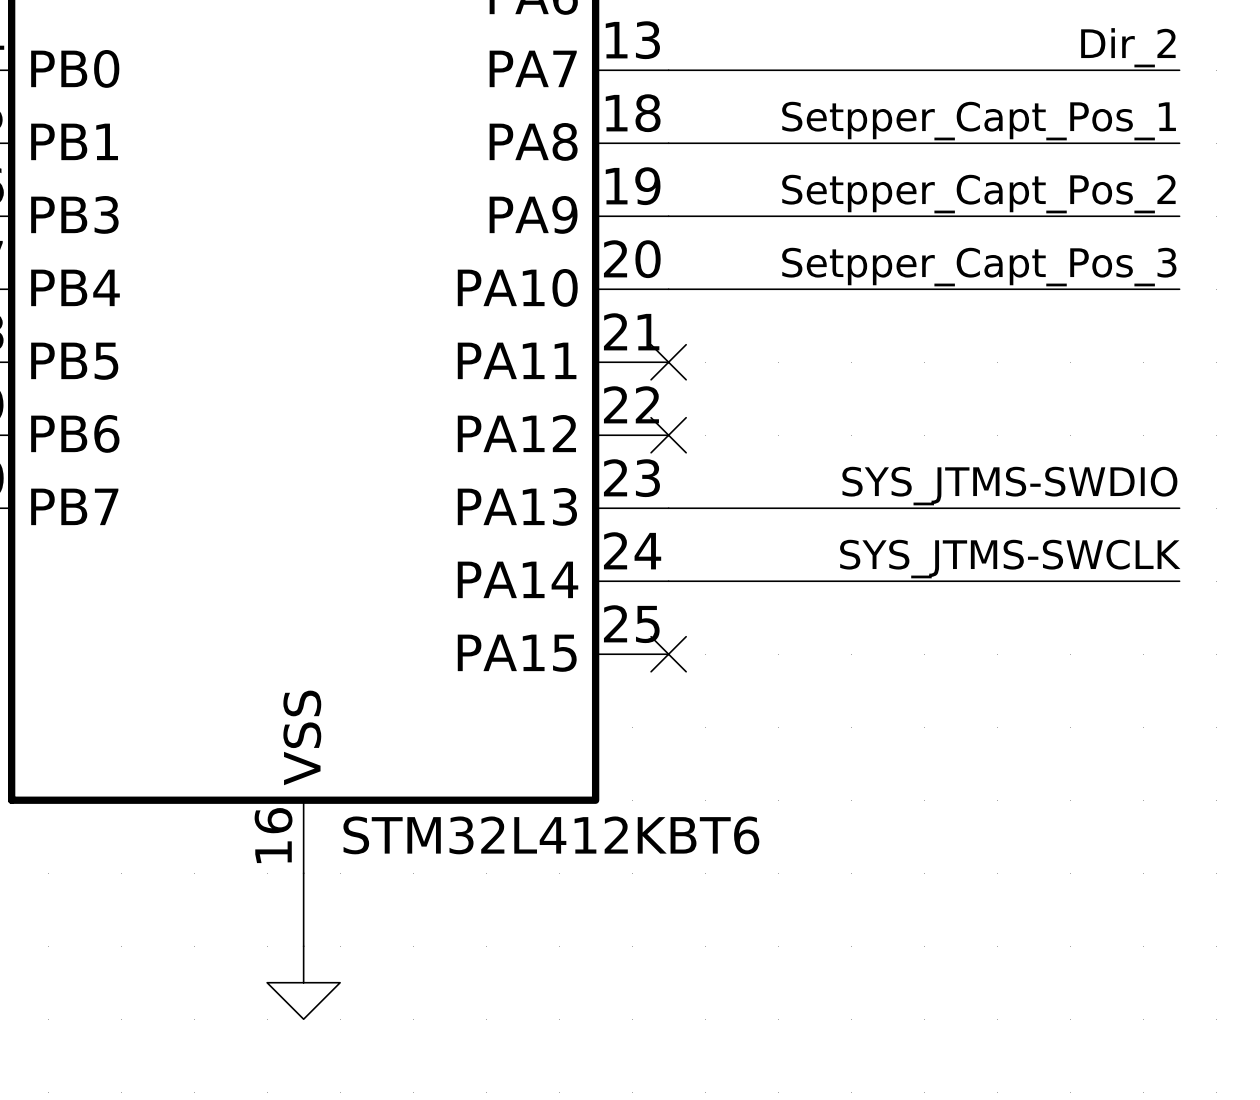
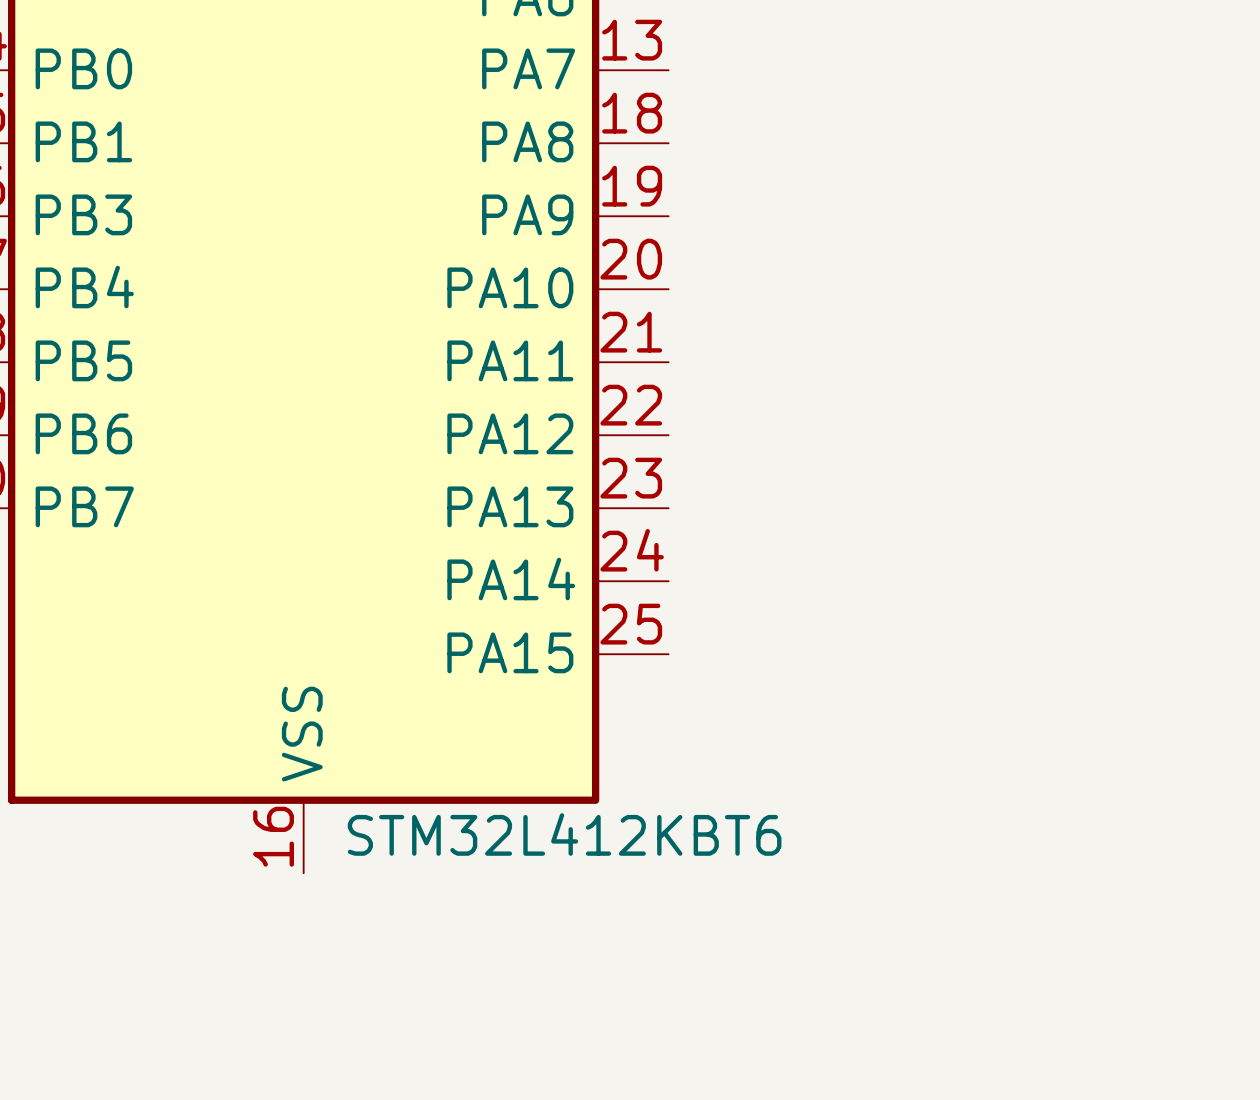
label: Dir_2 (1128, 47) -> none
wire: (668, 70) (1179, 70) -> none
label: Setpper_Capt_Pos_1 (979, 121) -> none
wire: (668, 143) (1179, 143) -> none
label: Setpper_Capt_Pos_2 (978, 194) -> none
wire: (668, 216) (1179, 216) -> none
label: Setpper_Capt_Pos_3 (979, 267) -> none
wire: (668, 289) (1179, 289) -> none
no-connect mark: (668, 362) -> none
no-connect mark: (668, 435) -> none
label: SYS_JTMS-SWDIO (1009, 486) -> none
wire: (668, 508) (1179, 508) -> none
label: SYS_JTMS-SWCLK (1010, 559) -> none
wire: (668, 581) (1179, 581) -> none
no-connect mark: (668, 654) -> none
wire: (303, 873) (303, 946) -> none
power symbol: (303, 982) -> none

